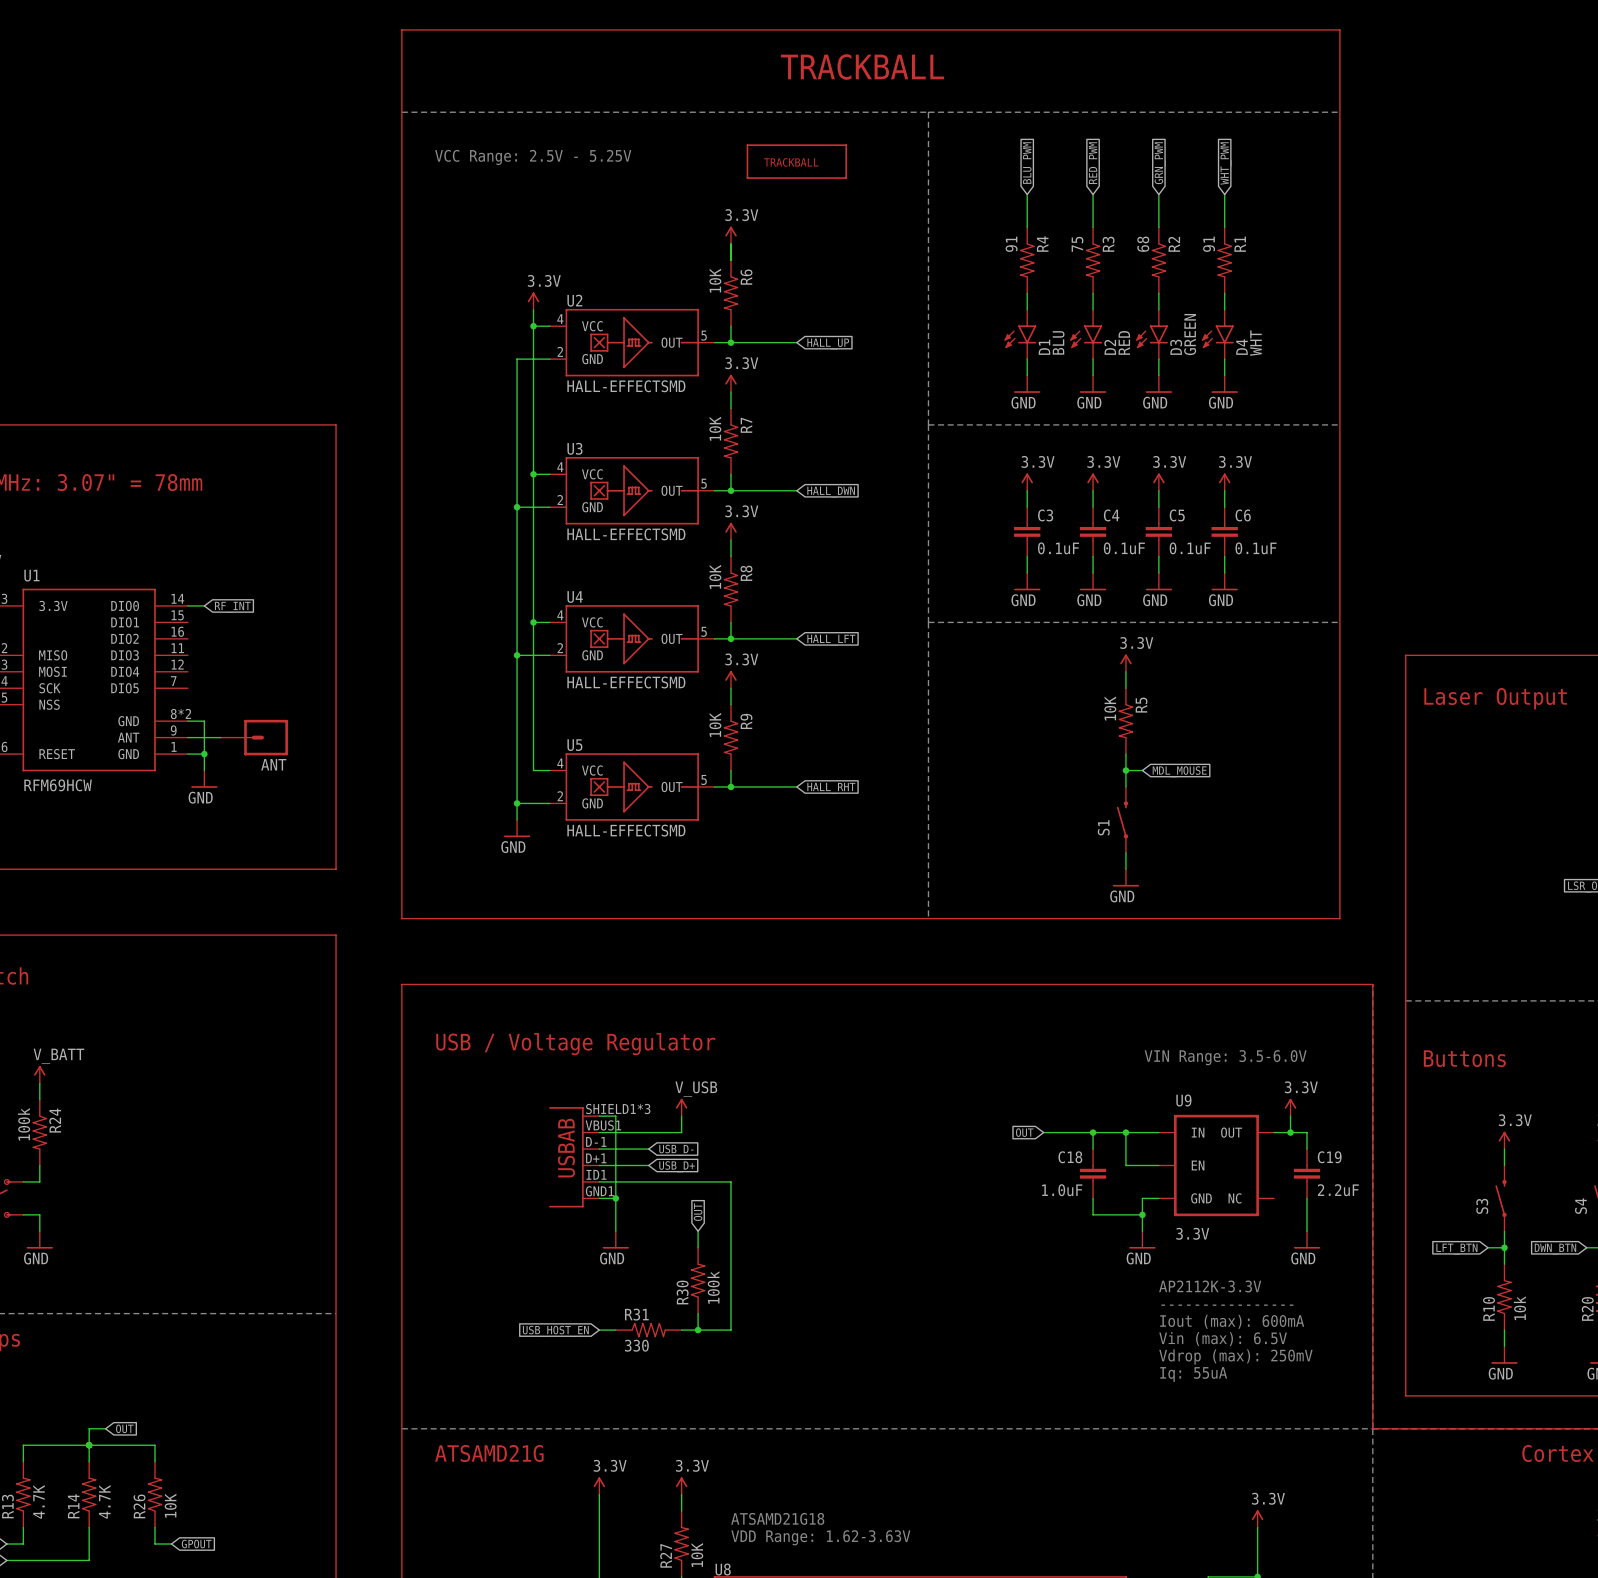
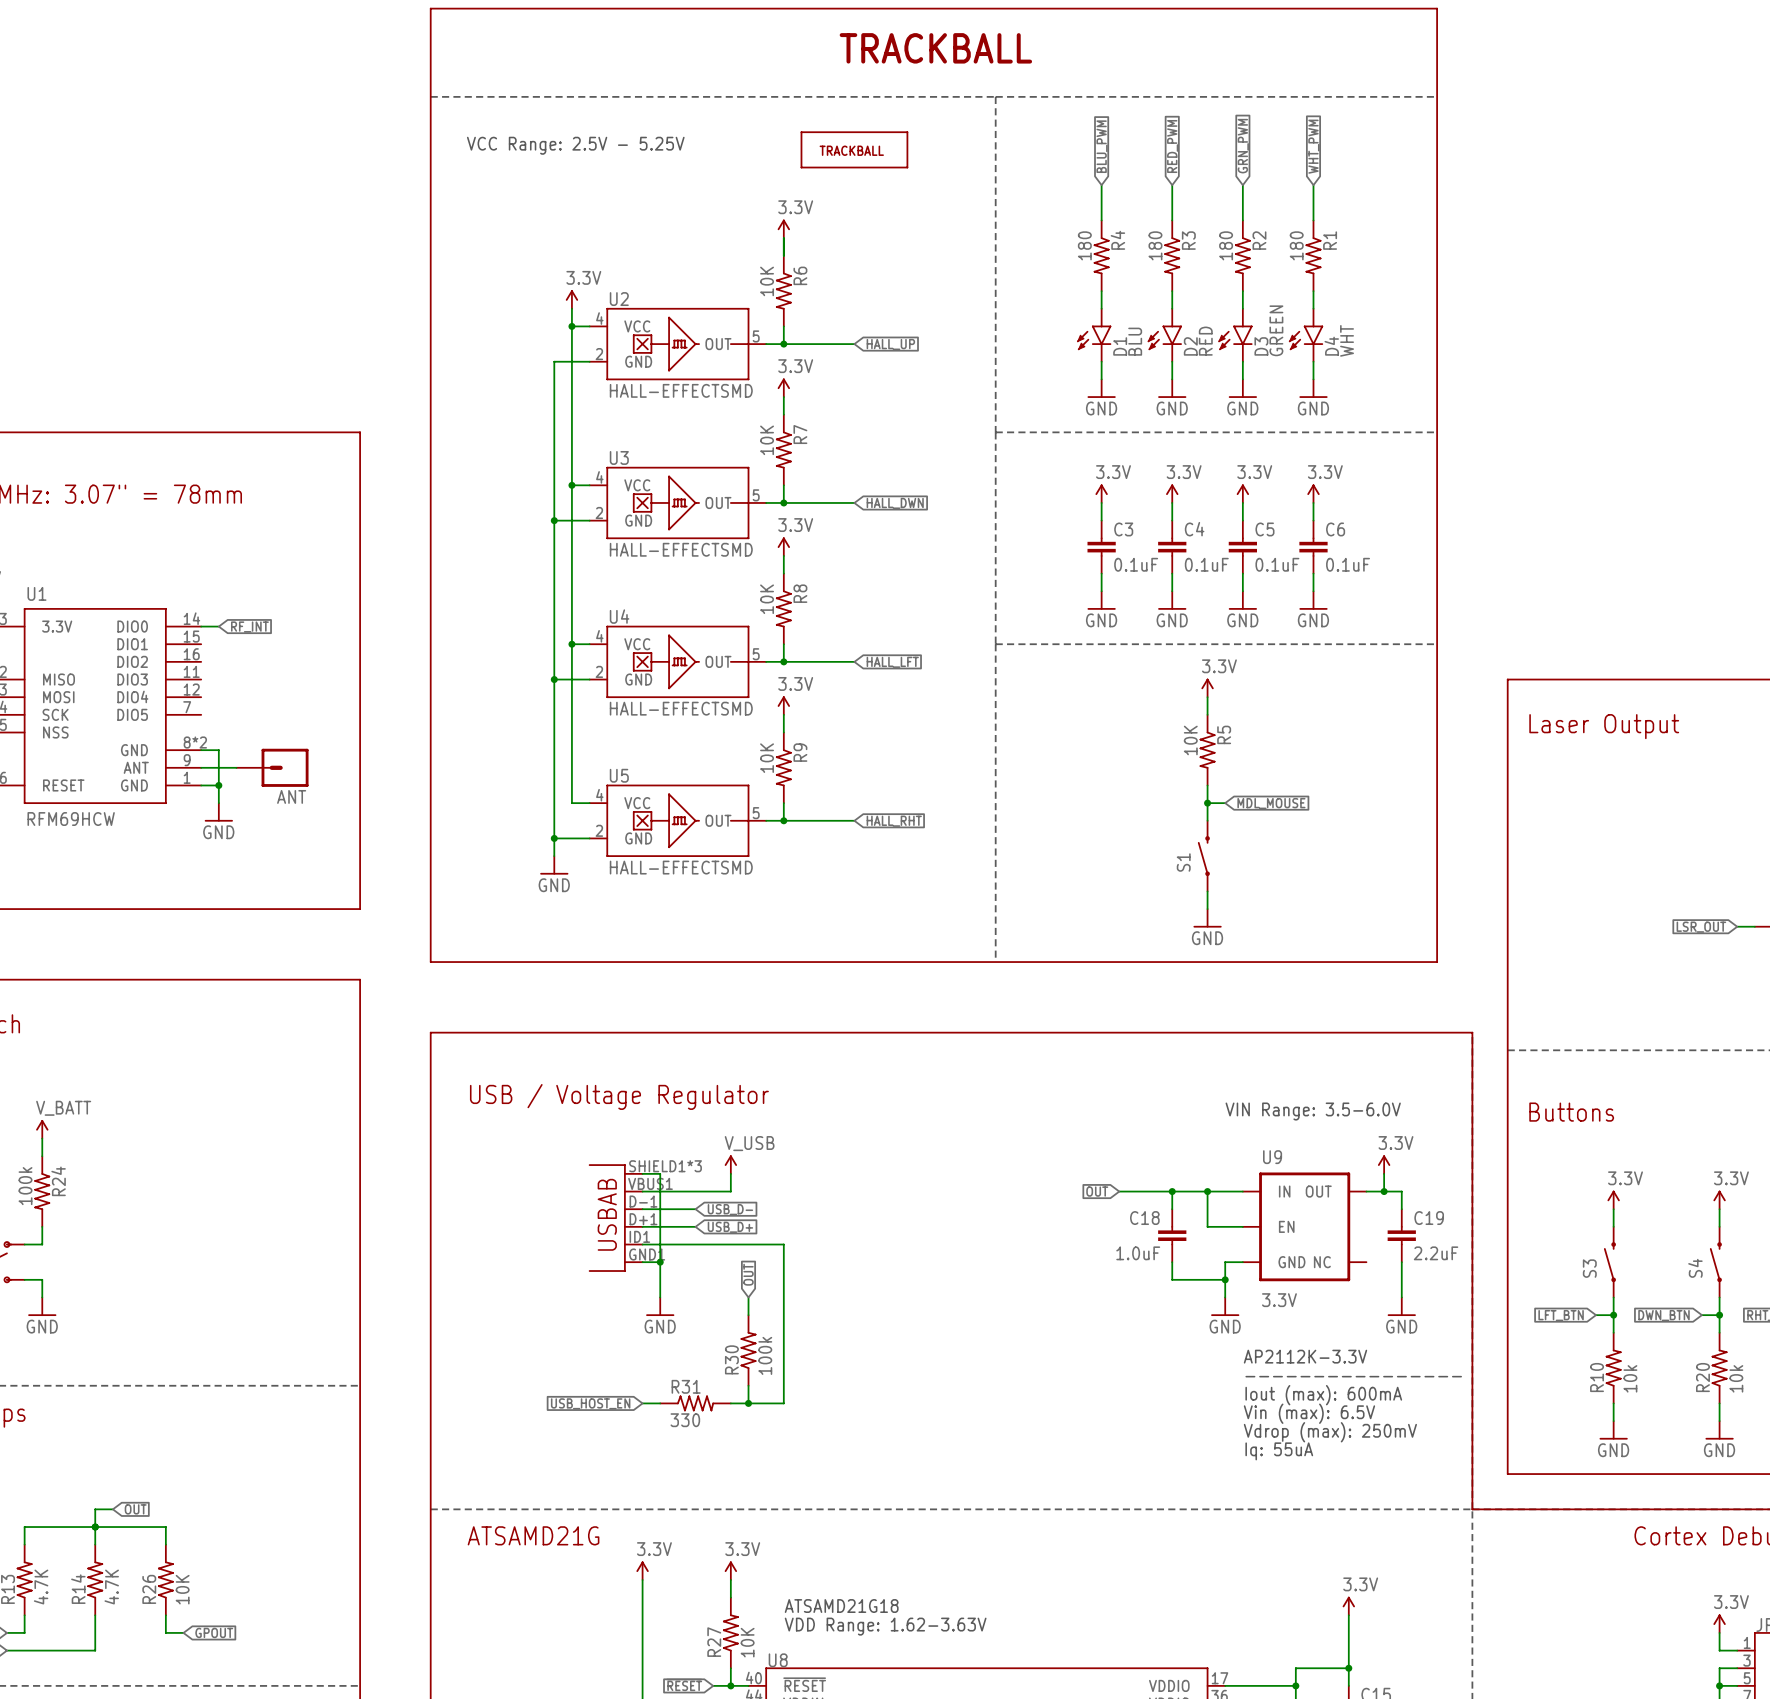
R4 value: 91 (1011, 244) -> 180 (1084, 245)
R3 value: 75 (1077, 244) -> 180 (1155, 245)
R2 value: 68 (1143, 244) -> 180 (1226, 245)
R1 value: 91 (1209, 244) -> 180 (1296, 245)

